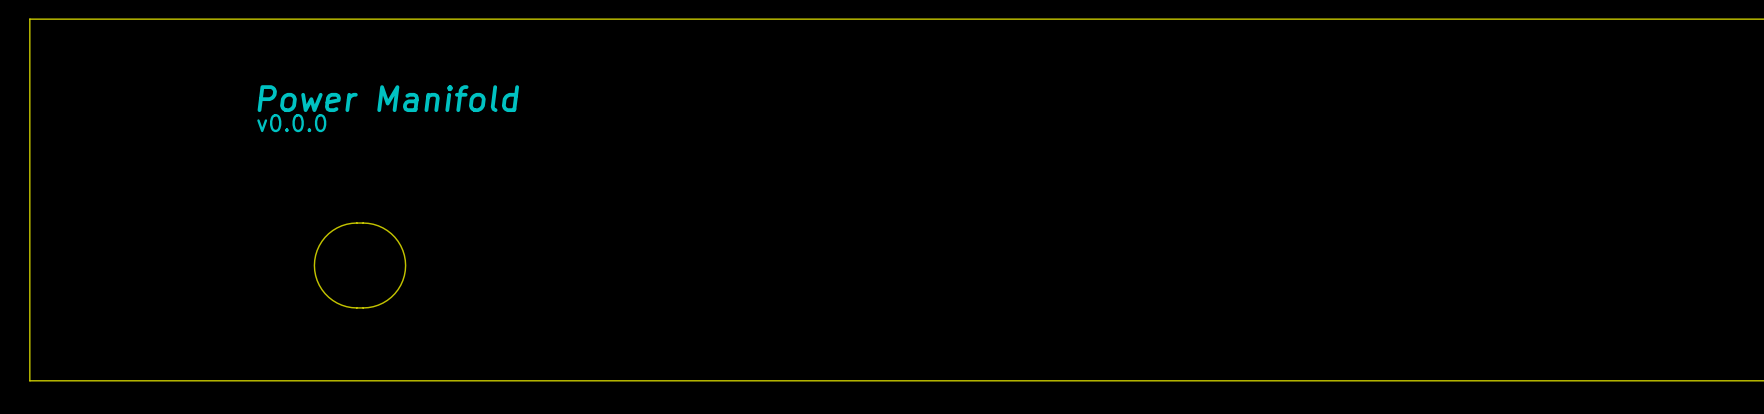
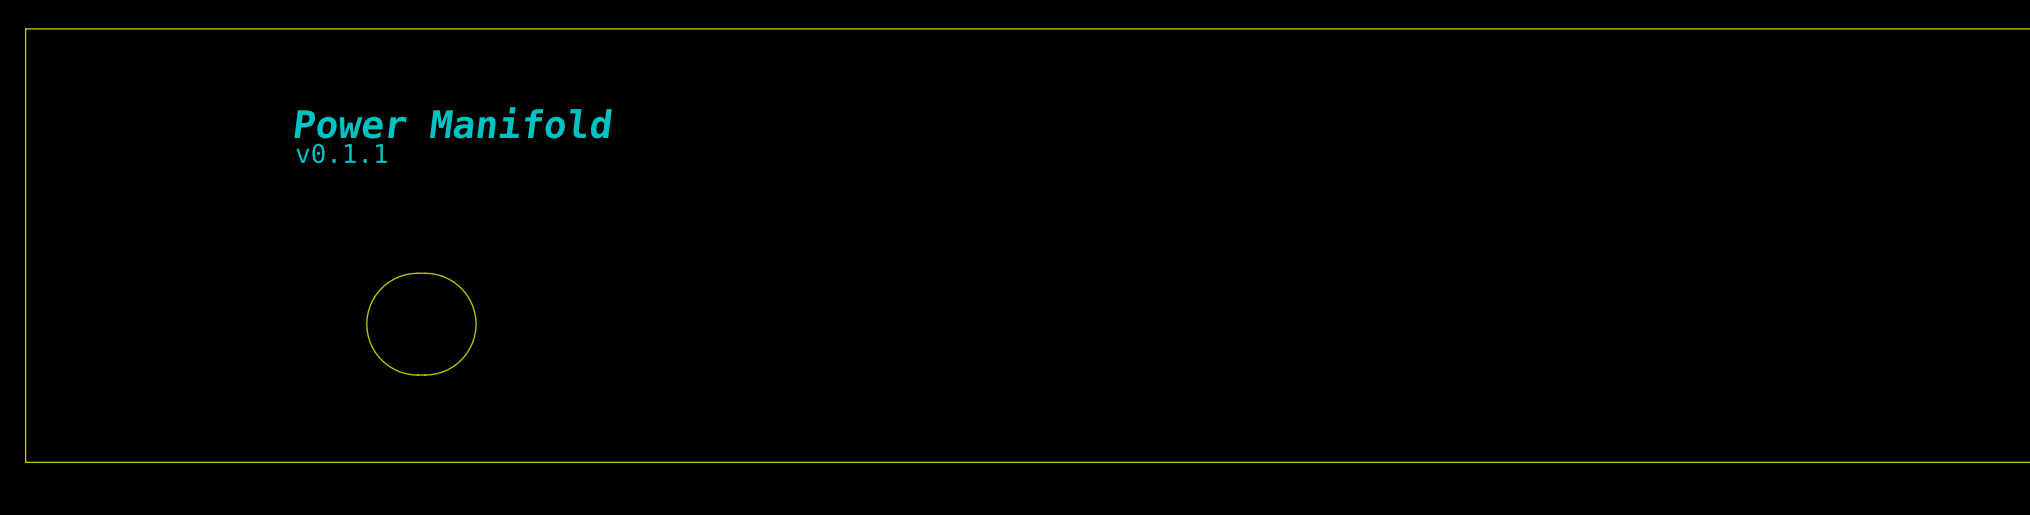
text: v0.0.0 (291, 123) -> v0.1.1 (341, 153)

